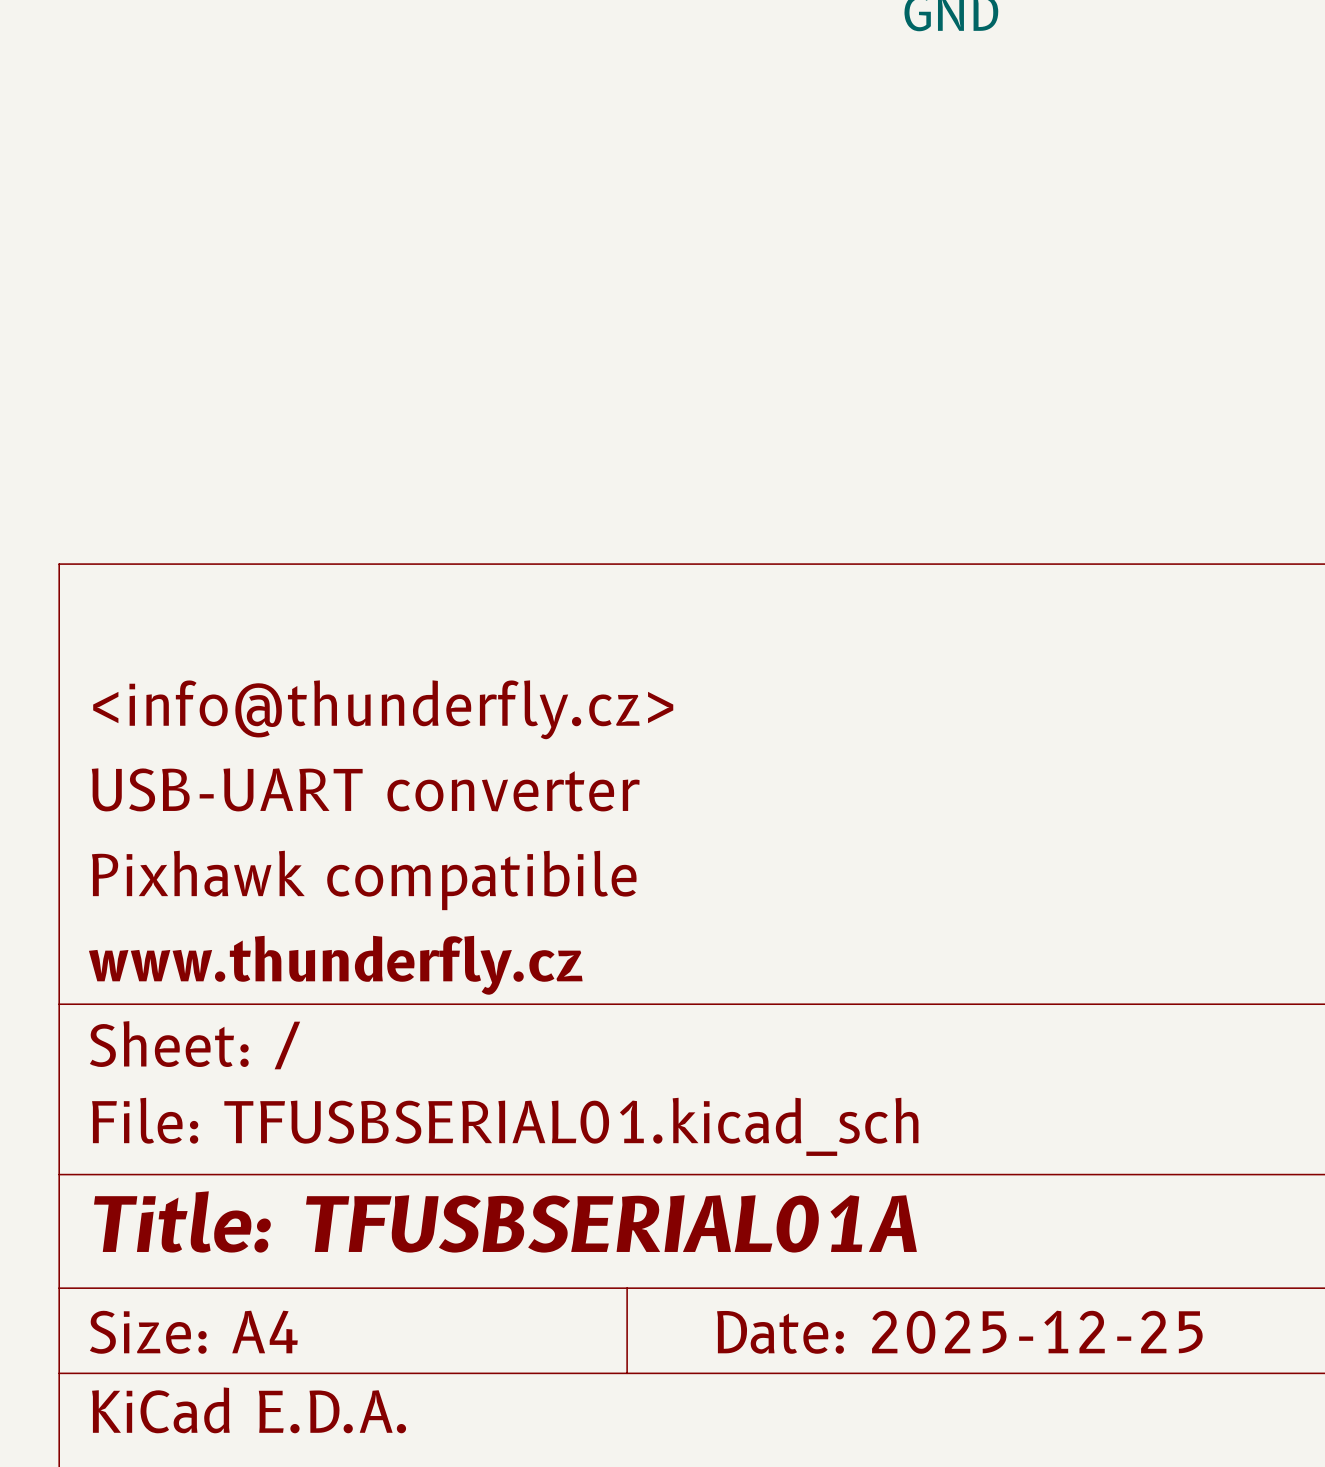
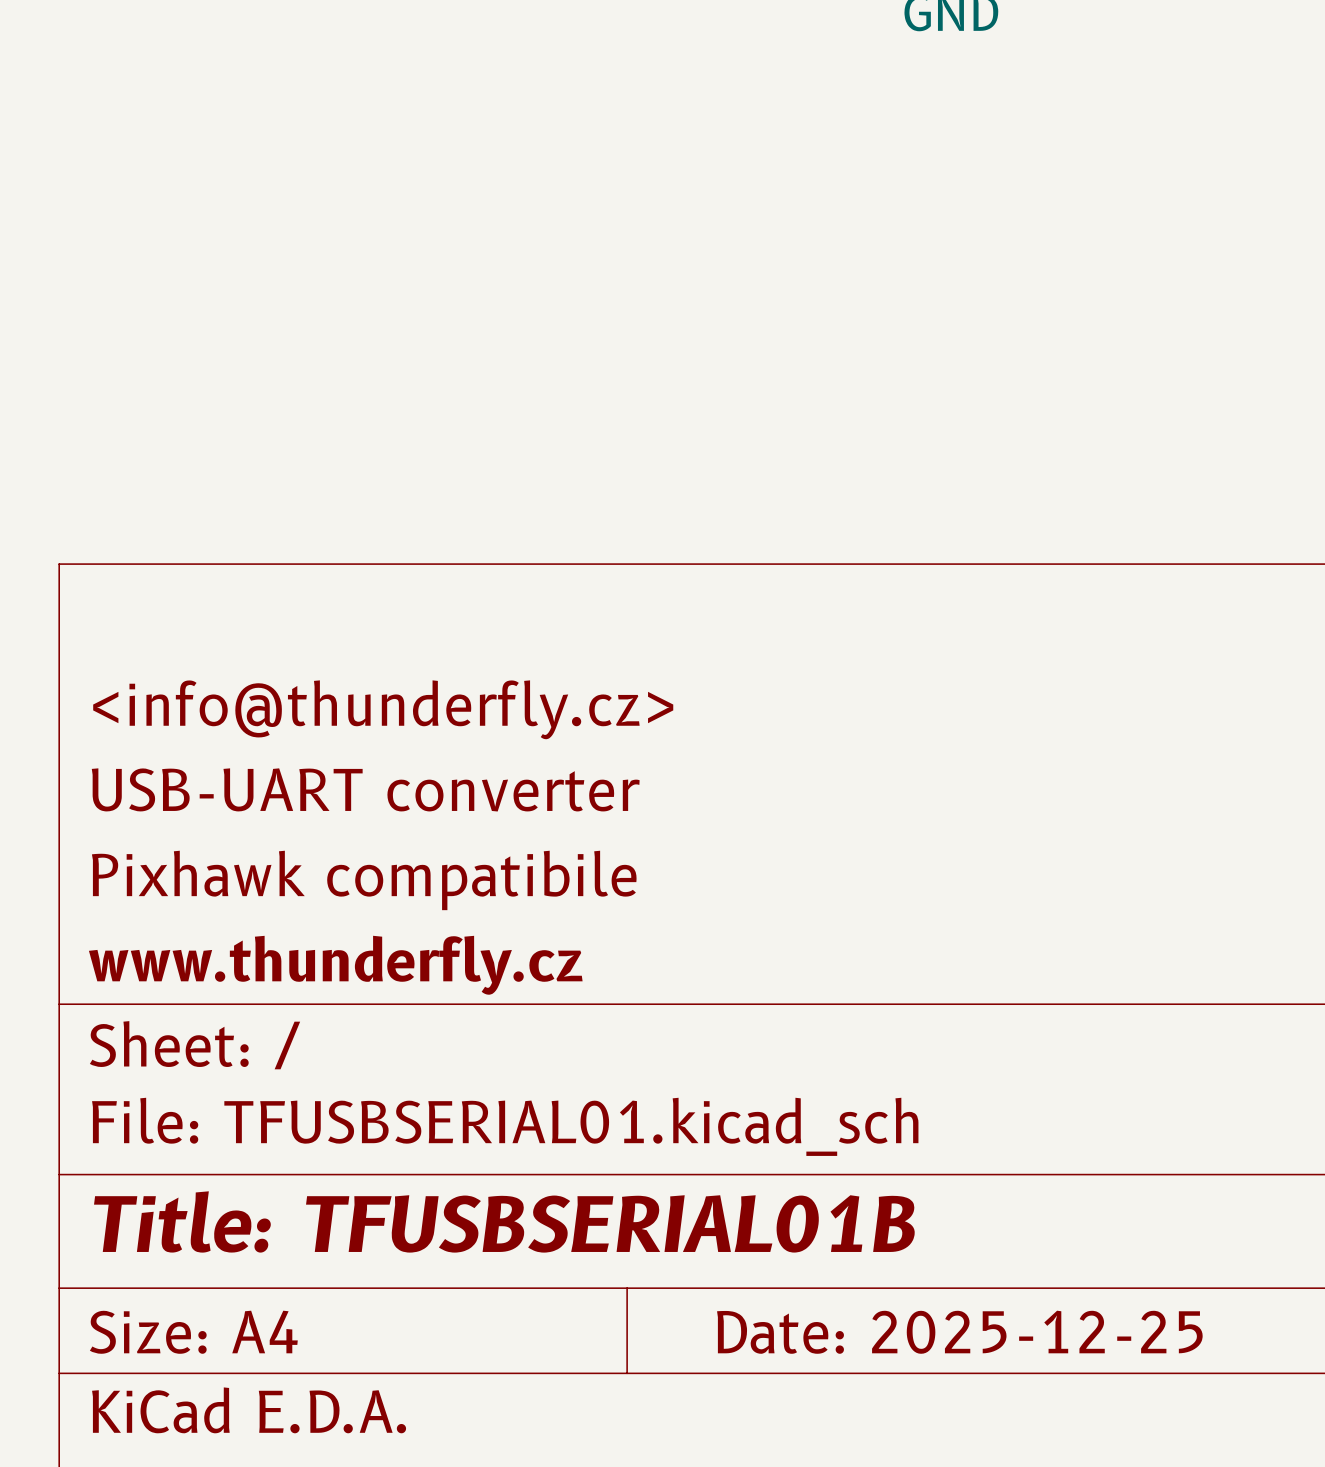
title block: Title: TFUSBSERIAL01A (505, 1221) -> Title: TFUSBSERIAL01B (504, 1221)

